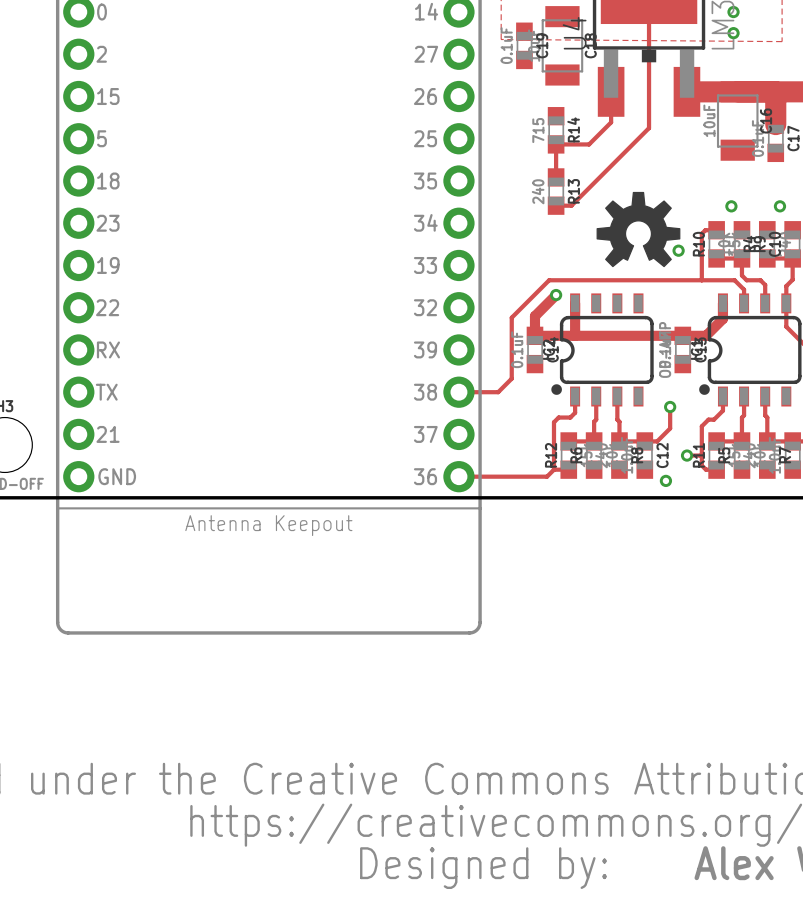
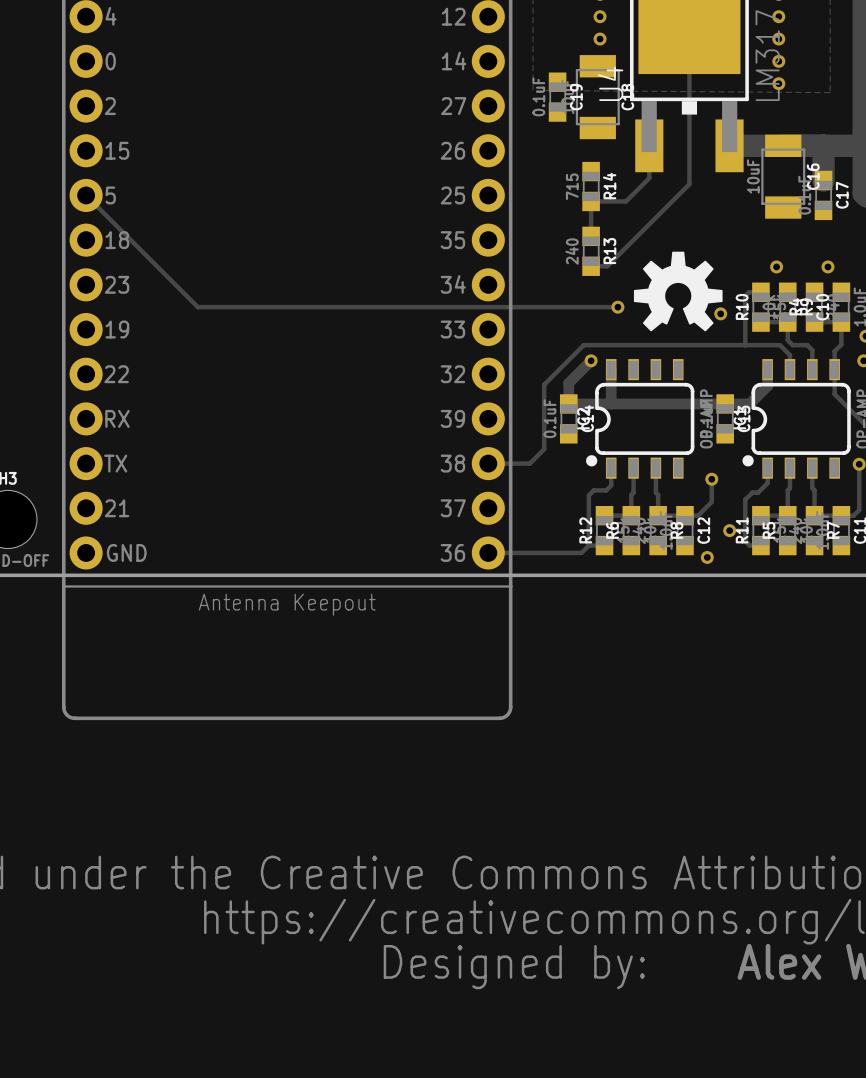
track: none -> (86, 195) (197, 307) (617, 307)
via: none -> (617, 307)

